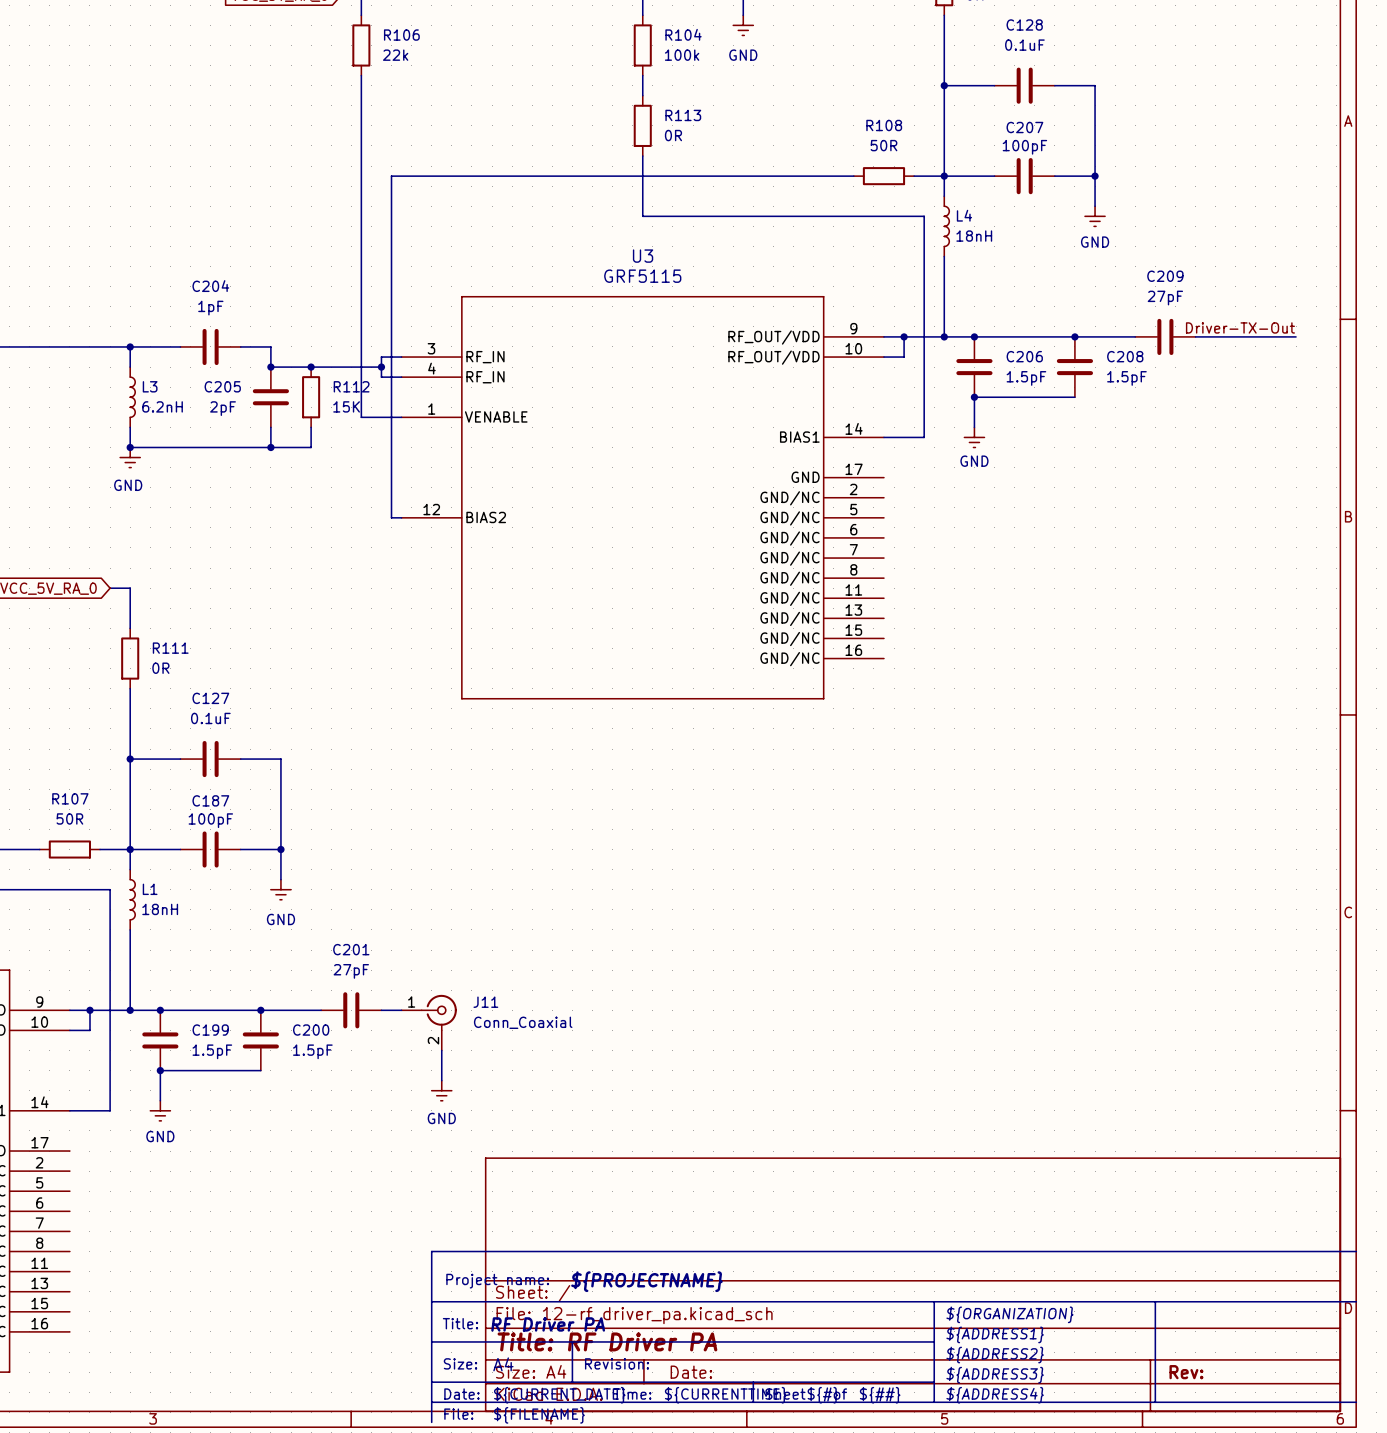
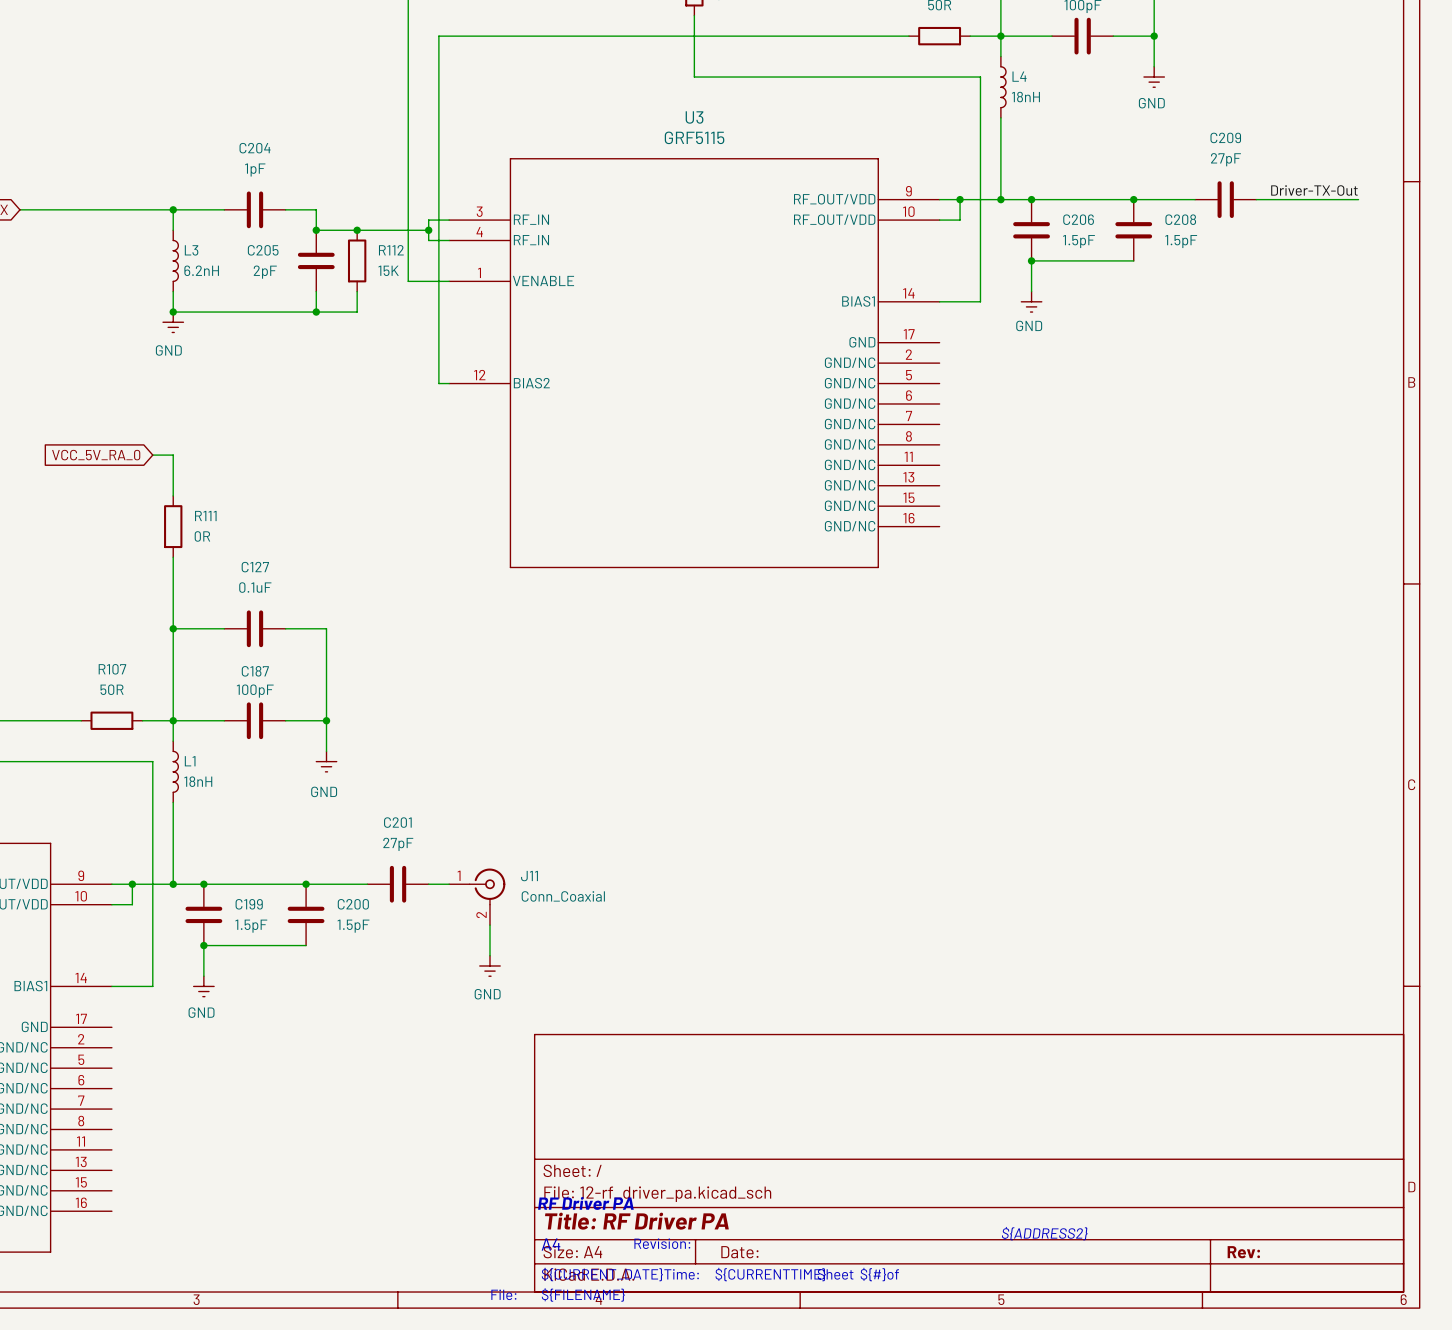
line: (1356, 1251) (431, 1251) (431, 1422) -> none
text: Project name: (497, 1281) -> none
text: ${PROJECTNAME} (646, 1281) -> none
line: (431, 1301) (1356, 1301) -> none
line: (934, 1301) (934, 1402) -> none
line: (1155, 1301) (1155, 1402) -> none
text: ${ORGANIZATION} (1009, 1314) -> none
text: Title: (460, 1323) -> none
text: ${ADDRESS1} (995, 1334) -> none
line: (431, 1341) (934, 1341) -> none
line: (572, 1341) (572, 1382) -> none
text: Size: (460, 1363) -> none
text: ${ADDRESS3} (995, 1375) -> none
line: (431, 1382) (934, 1382) -> none
line: (753, 1382) (753, 1402) -> none
text: Date: (461, 1394) -> none
text: ${##} (880, 1395) -> none
text: ${ADDRESS4} (995, 1395) -> none
line: (431, 1402) (1356, 1402) -> none

